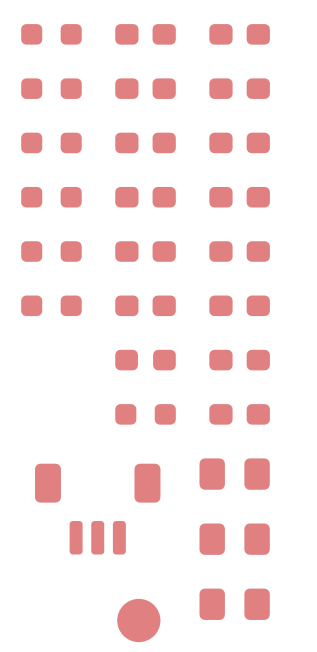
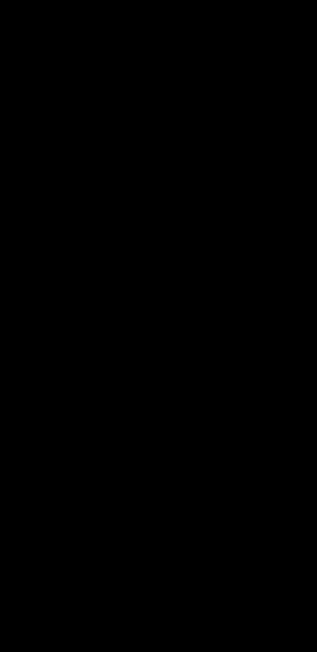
part: (51, 34) -> none
part: (145, 34) -> none
part: (239, 34) -> none
part: (51, 88) -> none
part: (145, 88) -> none
part: (239, 88) -> none
part: (51, 142) -> none
part: (145, 142) -> none
part: (239, 142) -> none
part: (51, 197) -> none
part: (145, 197) -> none
part: (239, 197) -> none
part: (51, 251) -> none
part: (145, 251) -> none
part: (239, 251) -> none
part: (51, 305) -> none
part: (145, 305) -> none
part: (239, 305) -> none
part: (145, 360) -> none
part: (239, 360) -> none
part: (145, 414) -> none
part: (239, 414) -> none
part: (234, 474) -> none
part: (97, 509) -> none
part: (234, 539) -> none
part: (234, 604) -> none
part: (138, 620) -> none

